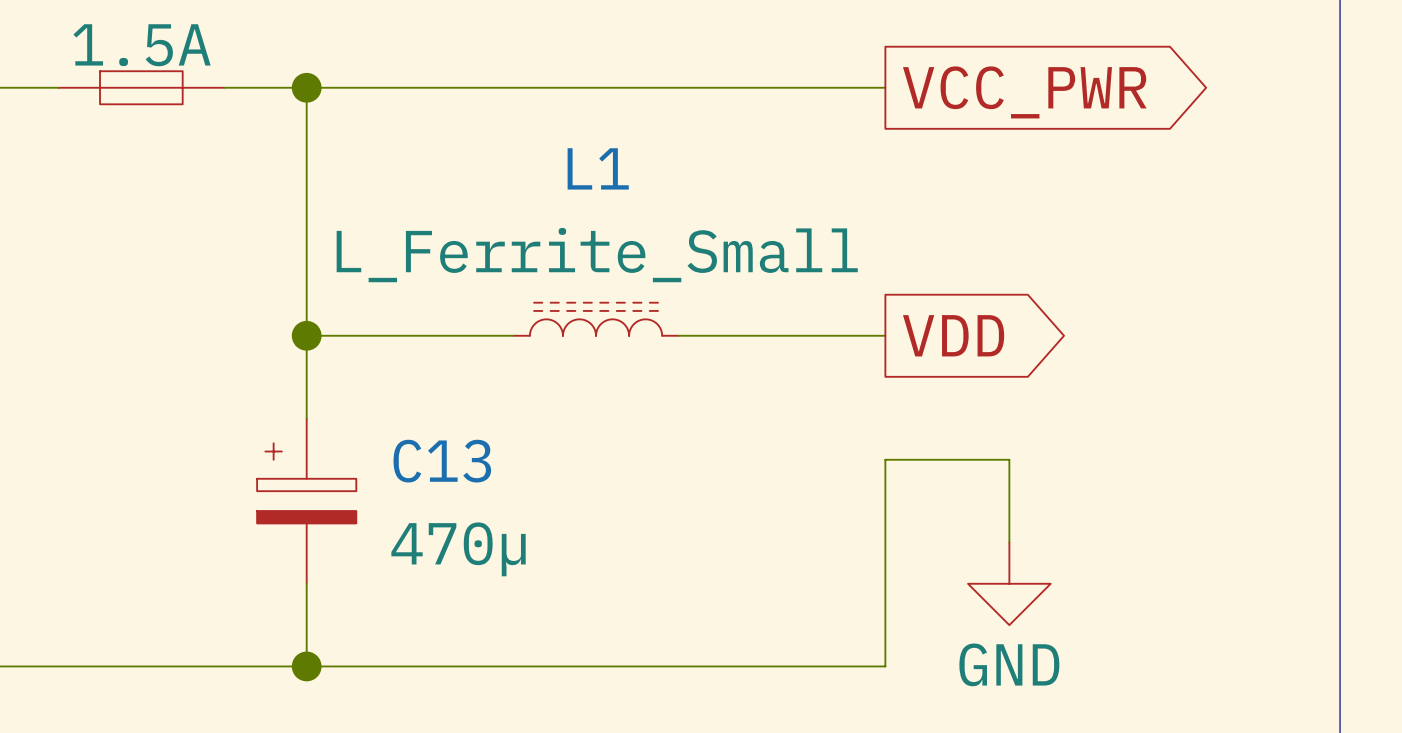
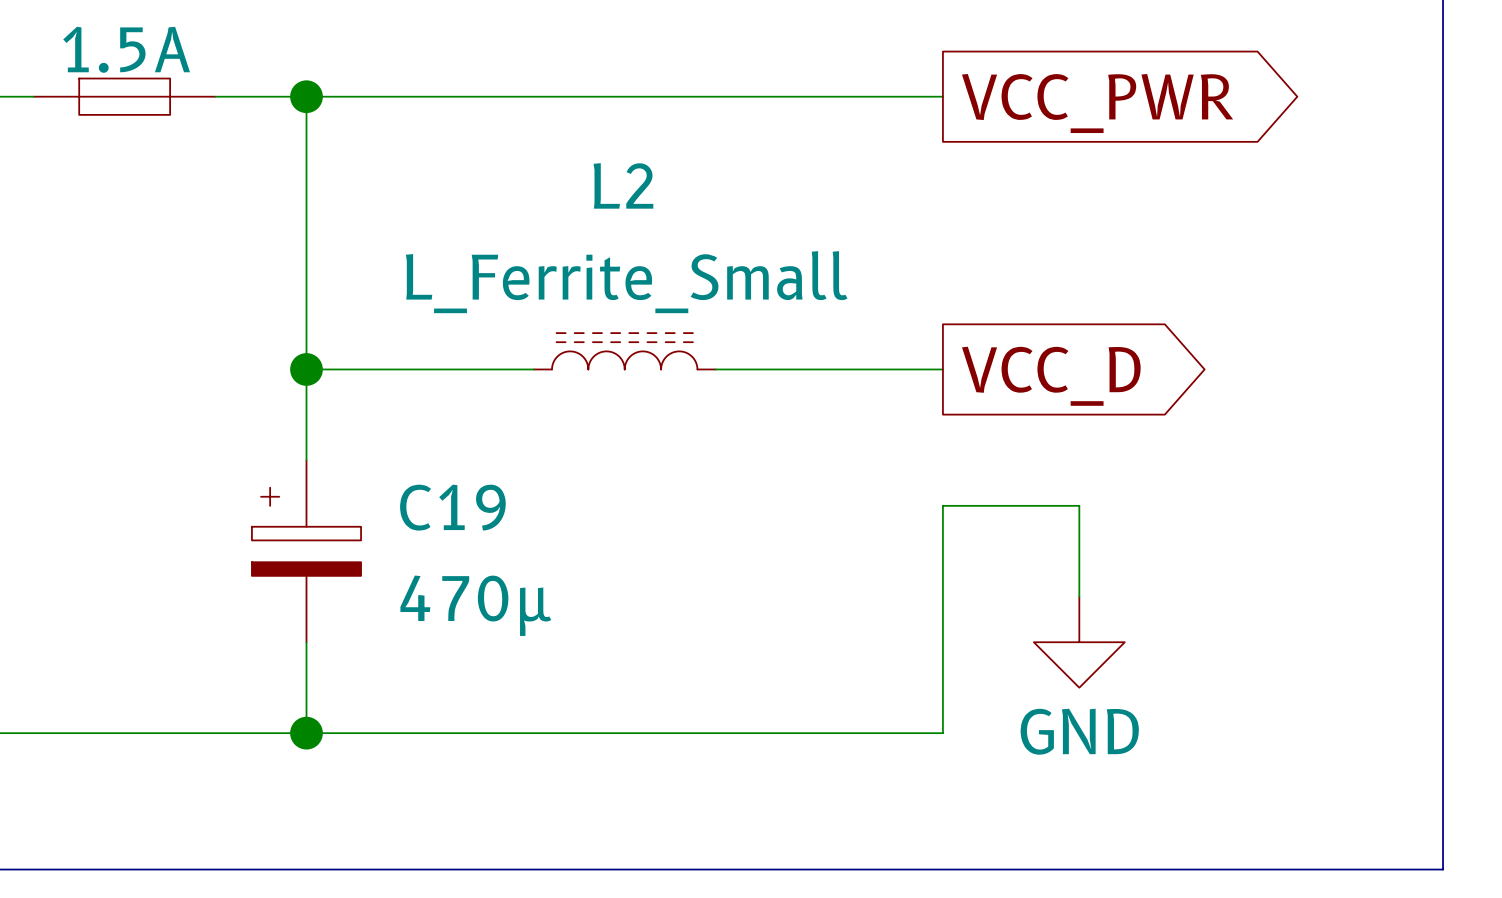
L1 name: L1 (598, 168) -> L2 (623, 185)
global label: VDD (953, 335) -> VCC_D (1051, 376)
C13 name: C13 (442, 461) -> C19 (452, 507)

